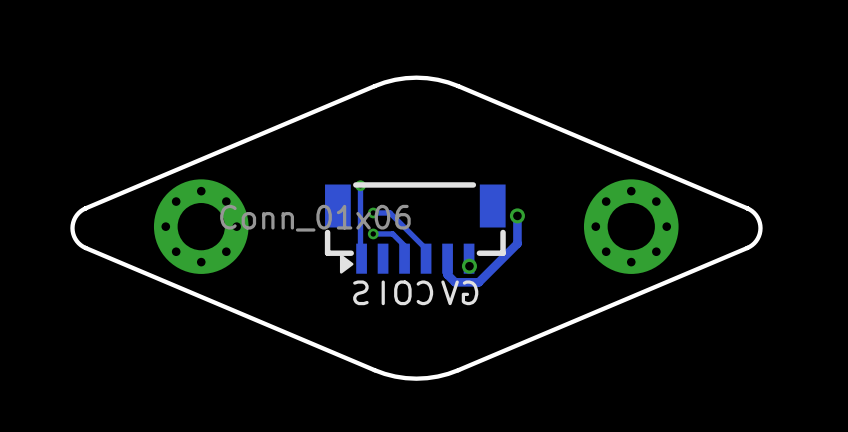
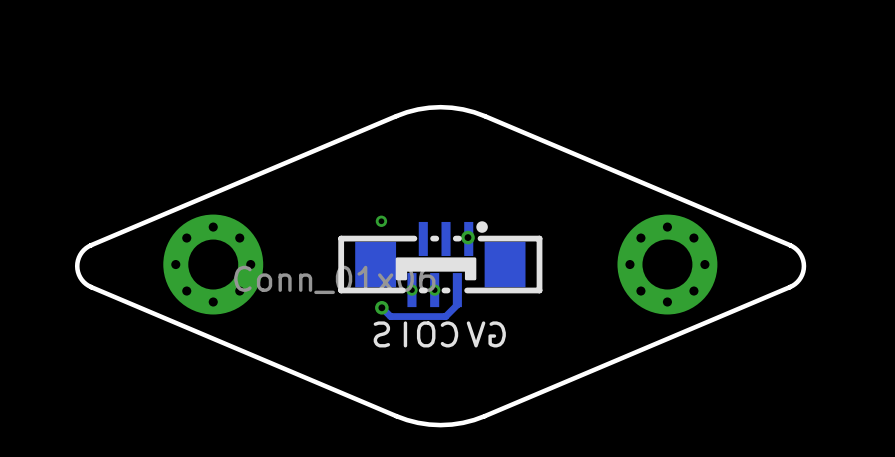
part footprint: [324, 182, 506, 274] -> [338, 221, 543, 308]
track: (360, 185) (361, 258) -> none
via: none -> (467, 237)
track: (373, 212) (390, 212) (426, 249) (426, 258) -> none
via: (373, 212) -> none
track: (517, 215) (517, 243) (478, 282) (455, 282) (447, 274) (447, 258) -> none
via: (517, 215) -> none
track: (373, 233) (392, 233) (404, 245) (404, 258) -> none
via: (373, 233) -> none
via: none -> (411, 290)
via: none -> (434, 290)
track: none -> (457, 290) (457, 304) (445, 316) (390, 316) (381, 307)
via: (469, 266) -> none
via: none -> (381, 307)

